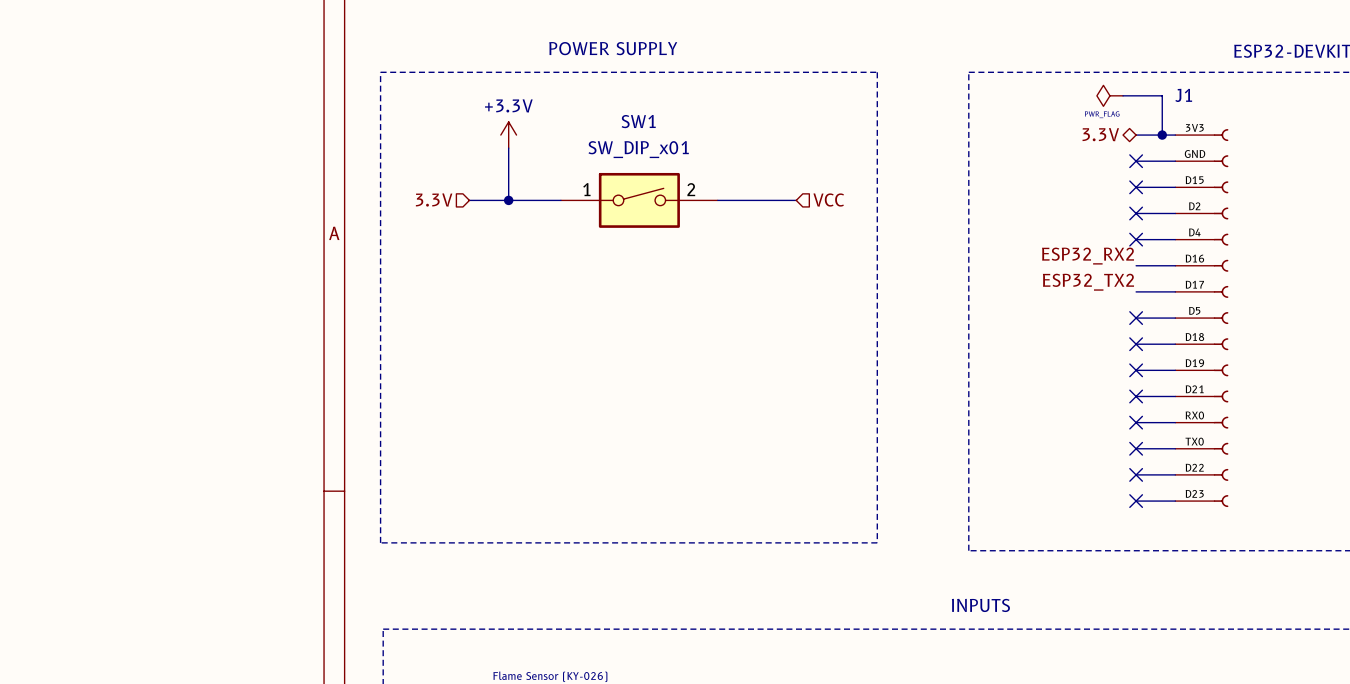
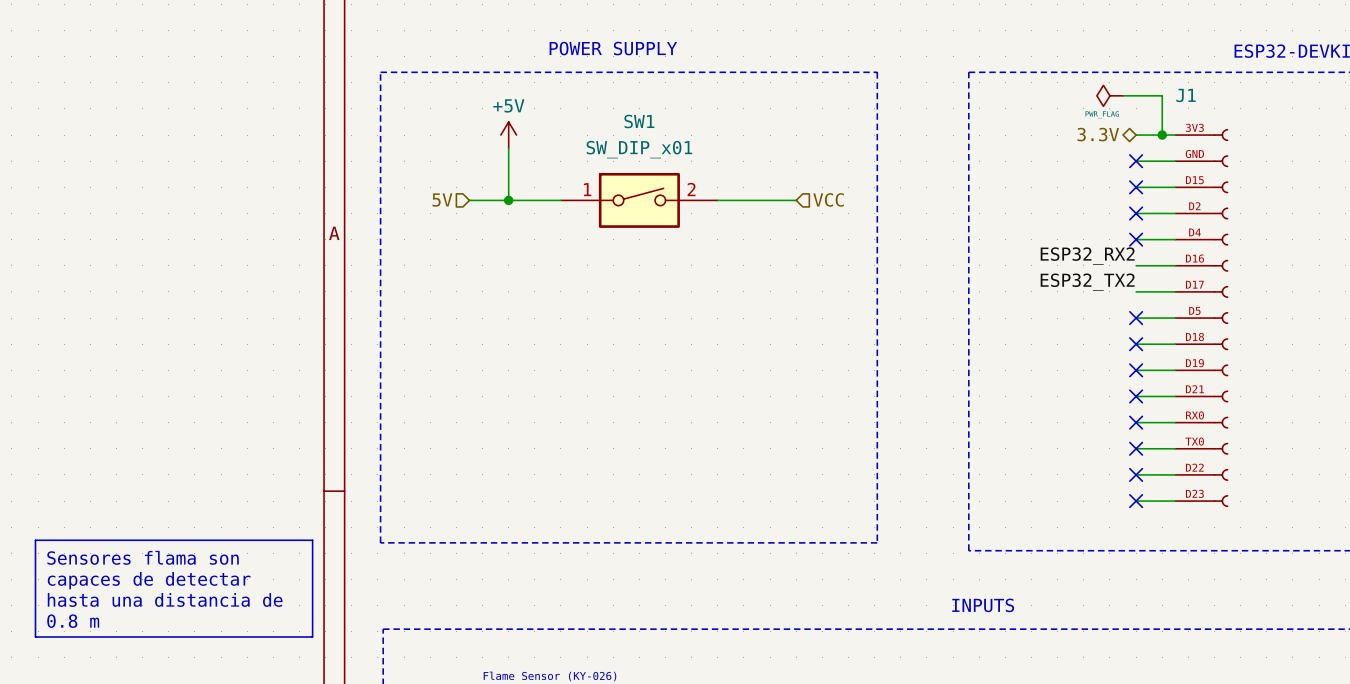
power symbol: +3.3V (508, 135) -> +5V (508, 135)
hierarchical label: 3.3V (434, 200) -> 5V (442, 200)
line: none -> (35, 540) (312, 540) (312, 637) (35, 637) (35, 540)
text: none -> Sensores flama son (143, 557)
text: none -> capaces de detectar (149, 580)
text: none -> hasta una distancia de (165, 599)
text: none -> 0.8 m (73, 621)

